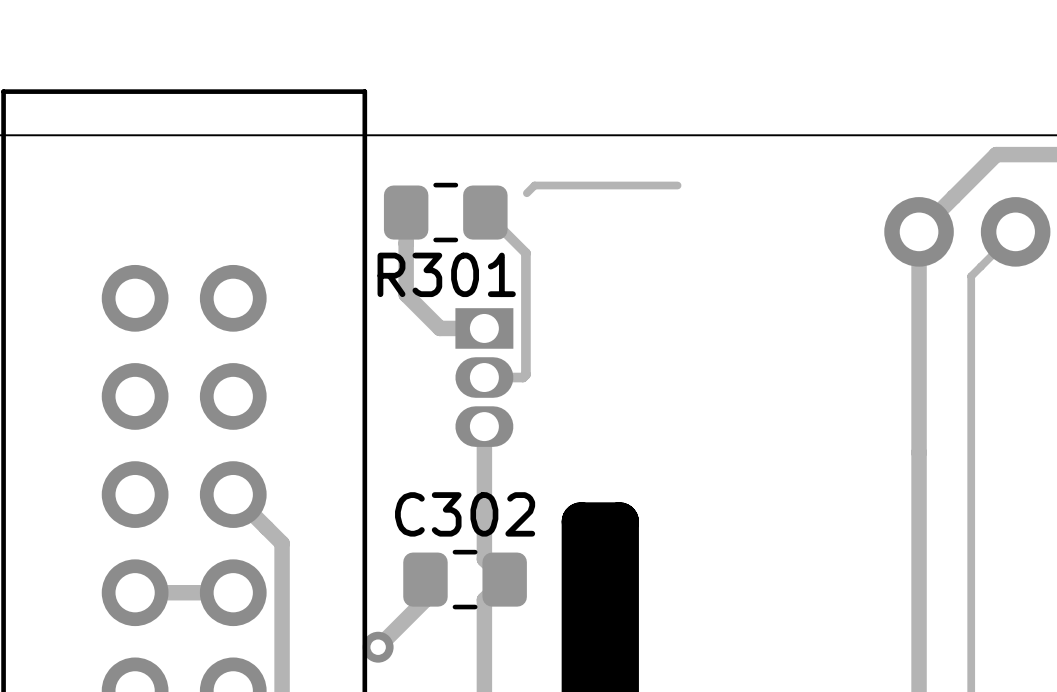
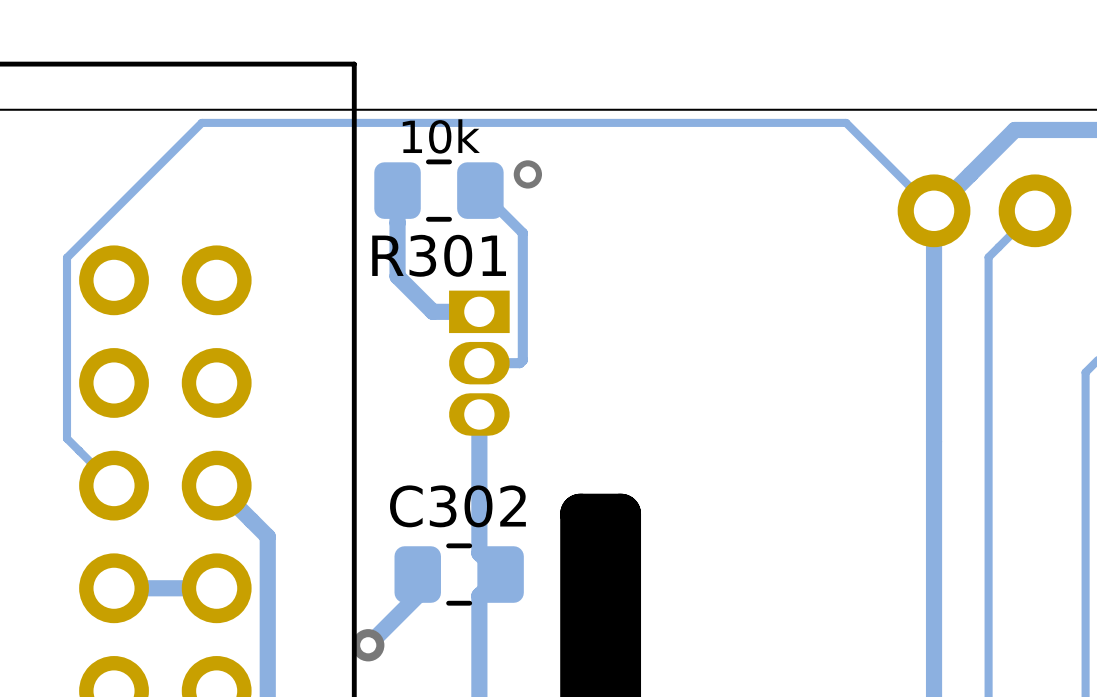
R301 value: none -> 10k (441, 136)
track: (677, 185) (534, 185) (526, 193) -> none
via: none -> (527, 174)
track: none -> (934, 210) (846, 122) (201, 122) (67, 257) (67, 438) (114, 485)

